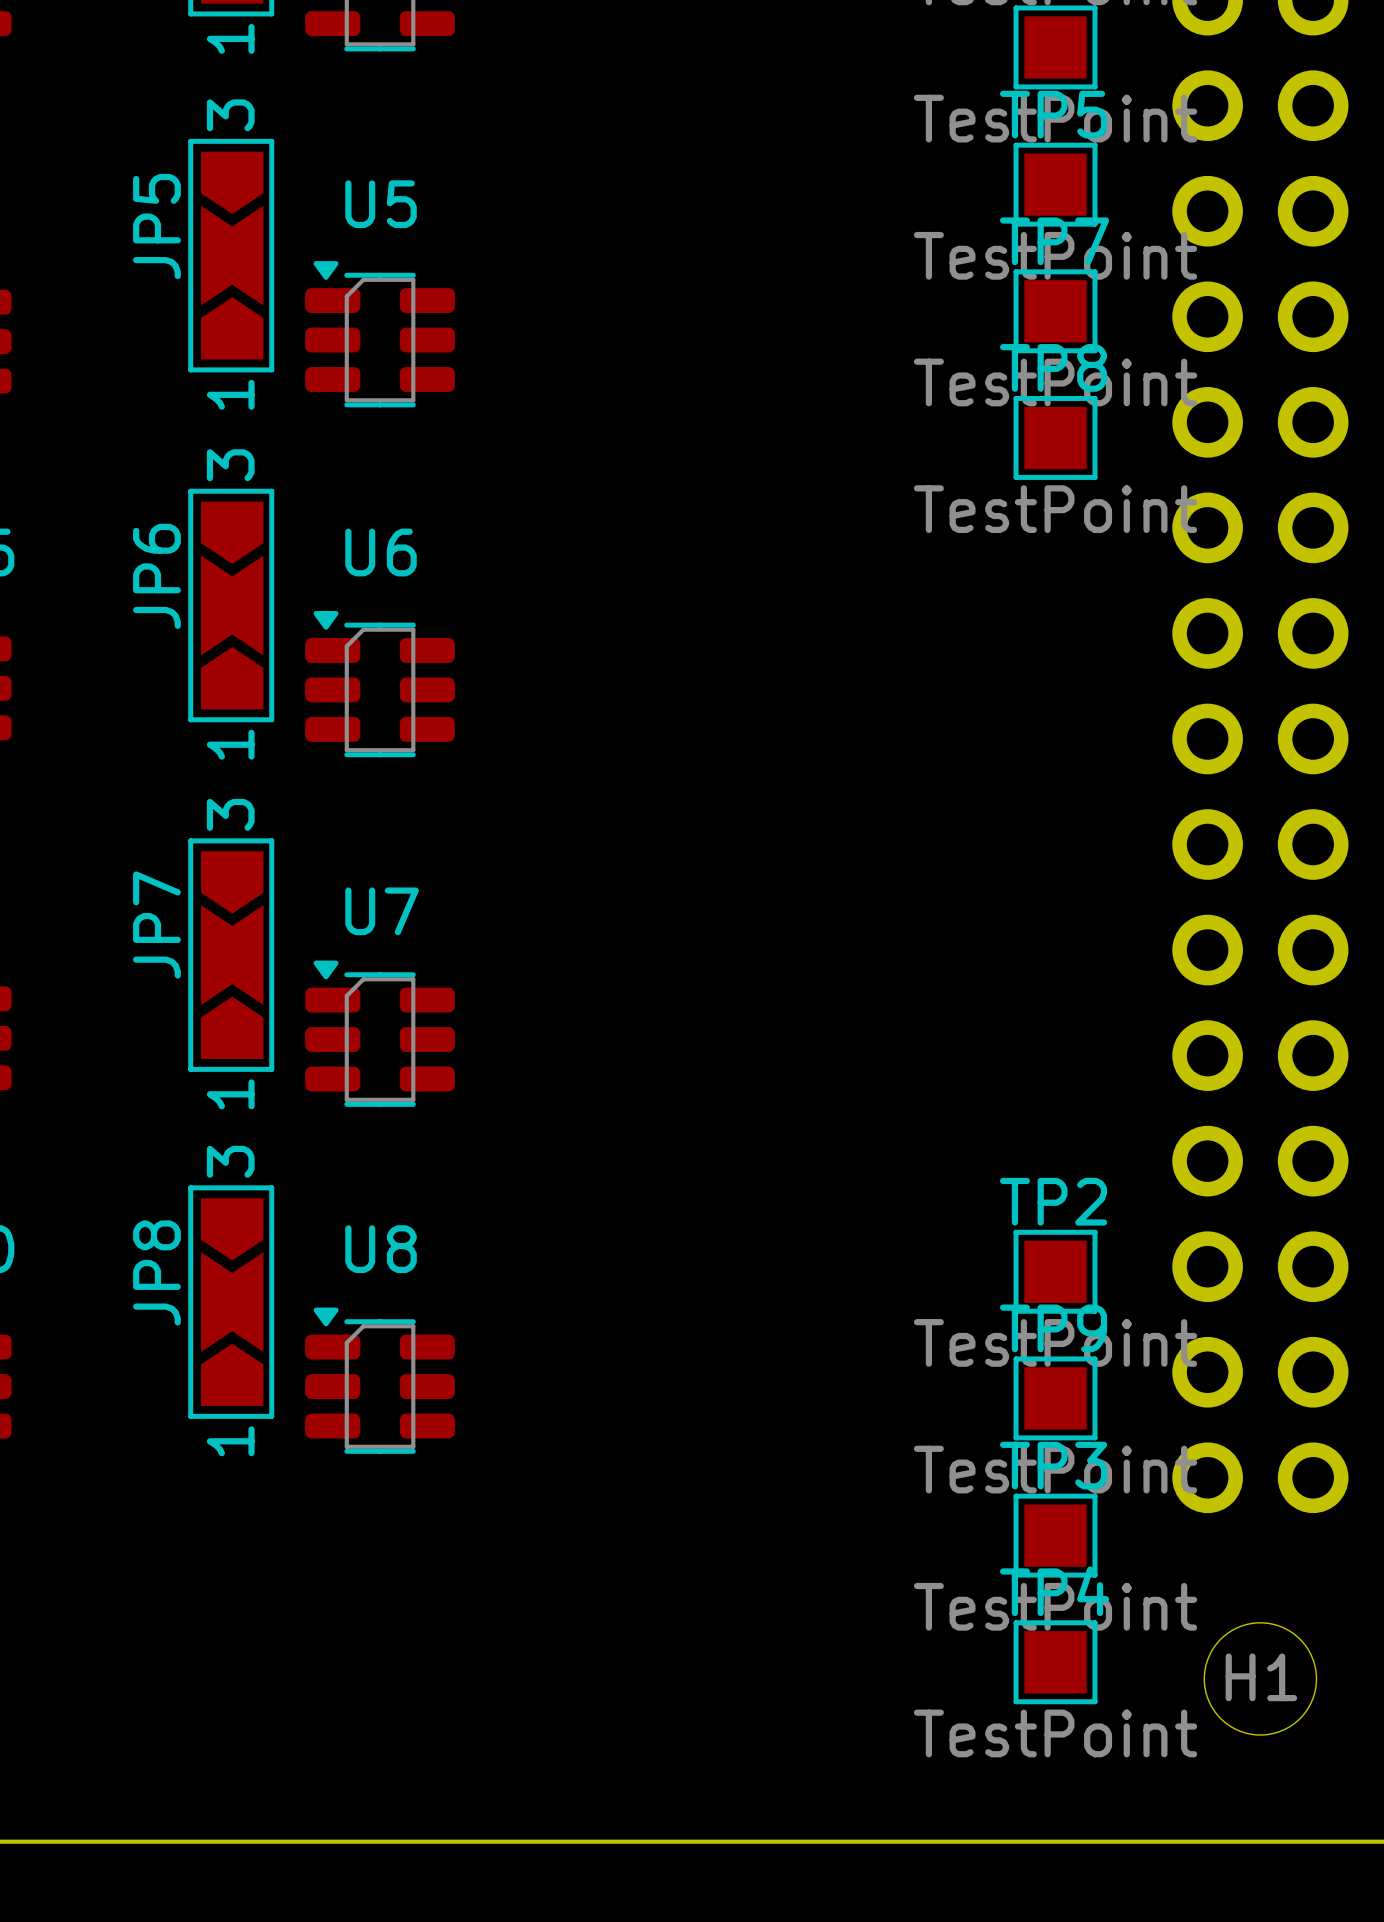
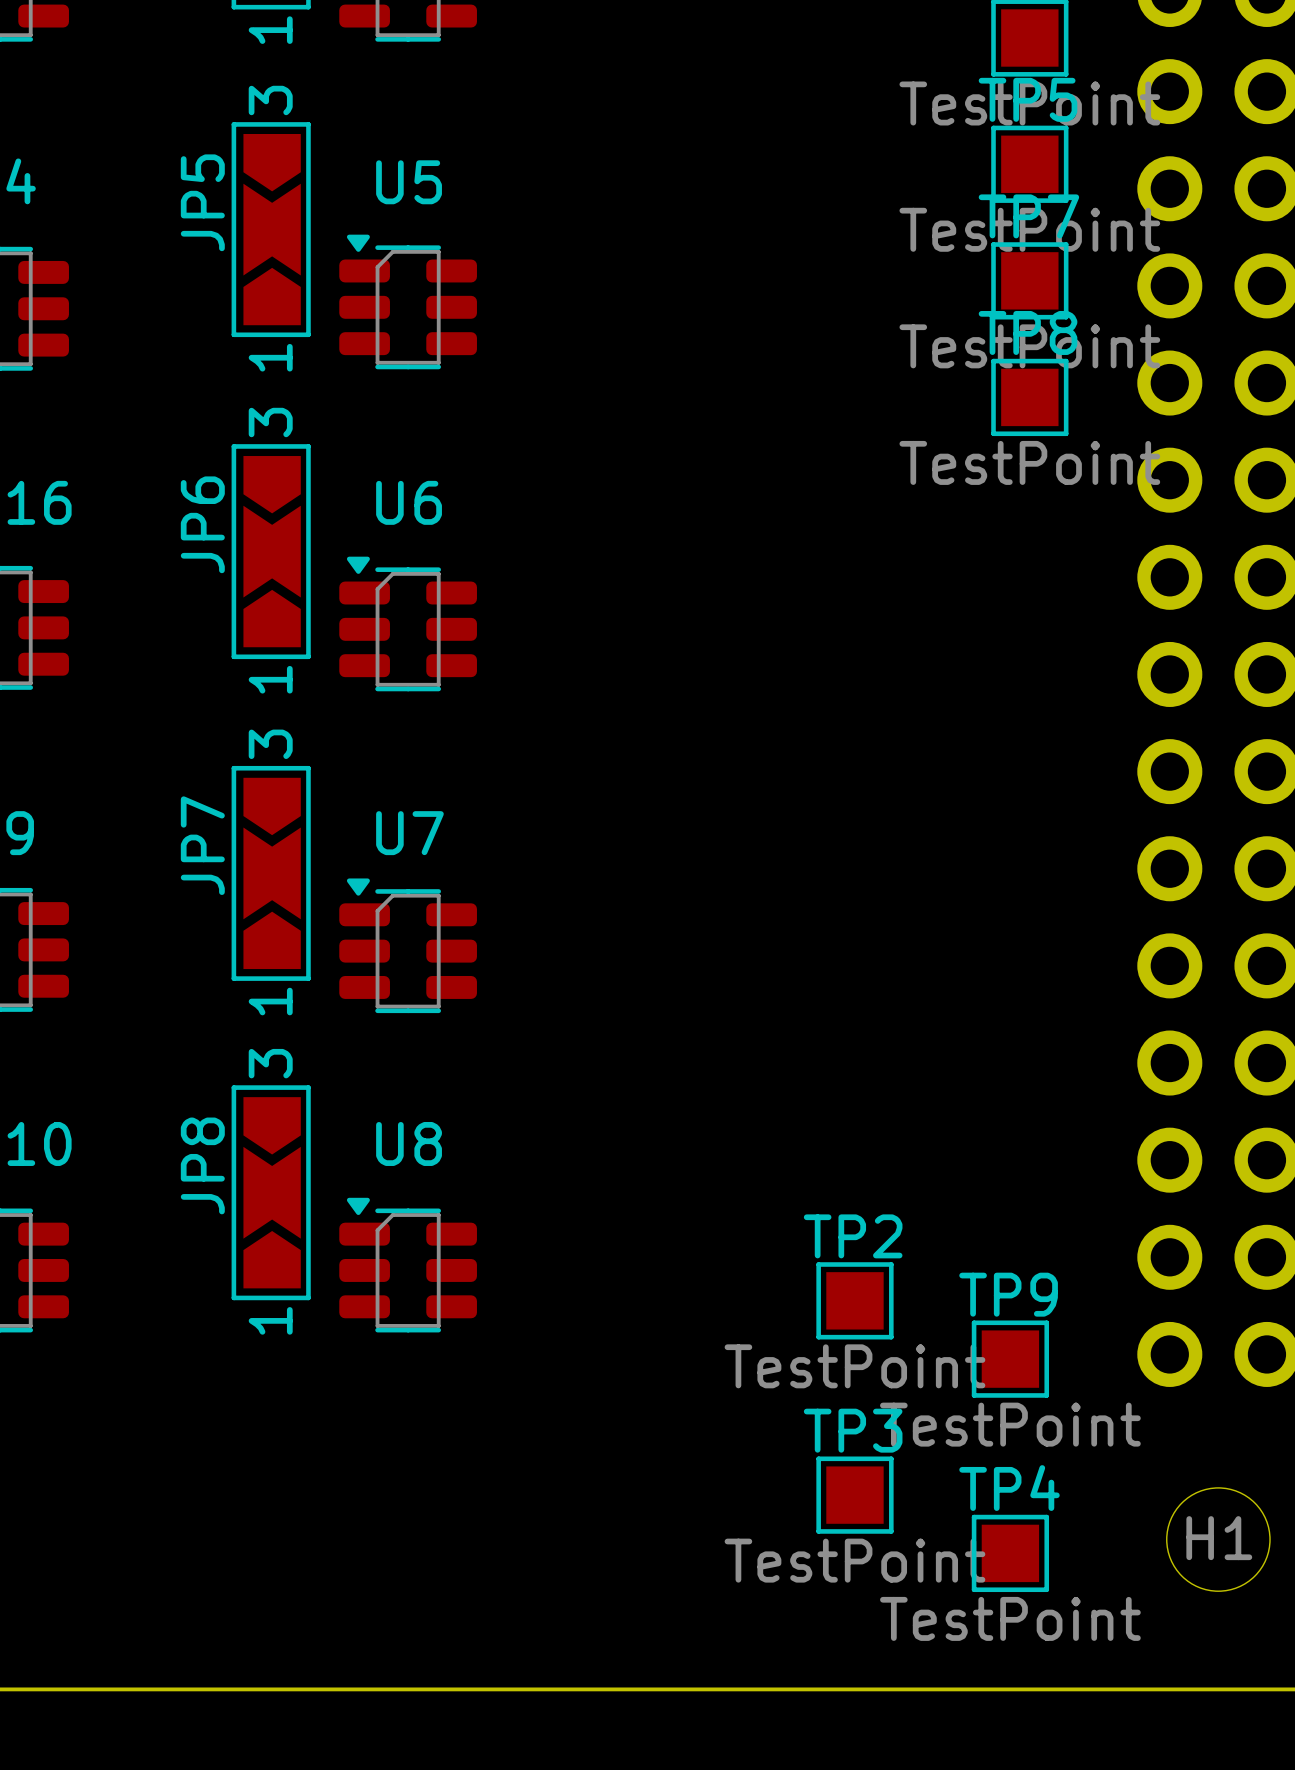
TP2 position: (1055, 1271) -> (854, 1300)
TP9 position: (1055, 1398) -> (1010, 1359)
TP3 position: (1055, 1535) -> (854, 1495)
TP4 position: (1055, 1662) -> (1010, 1553)

